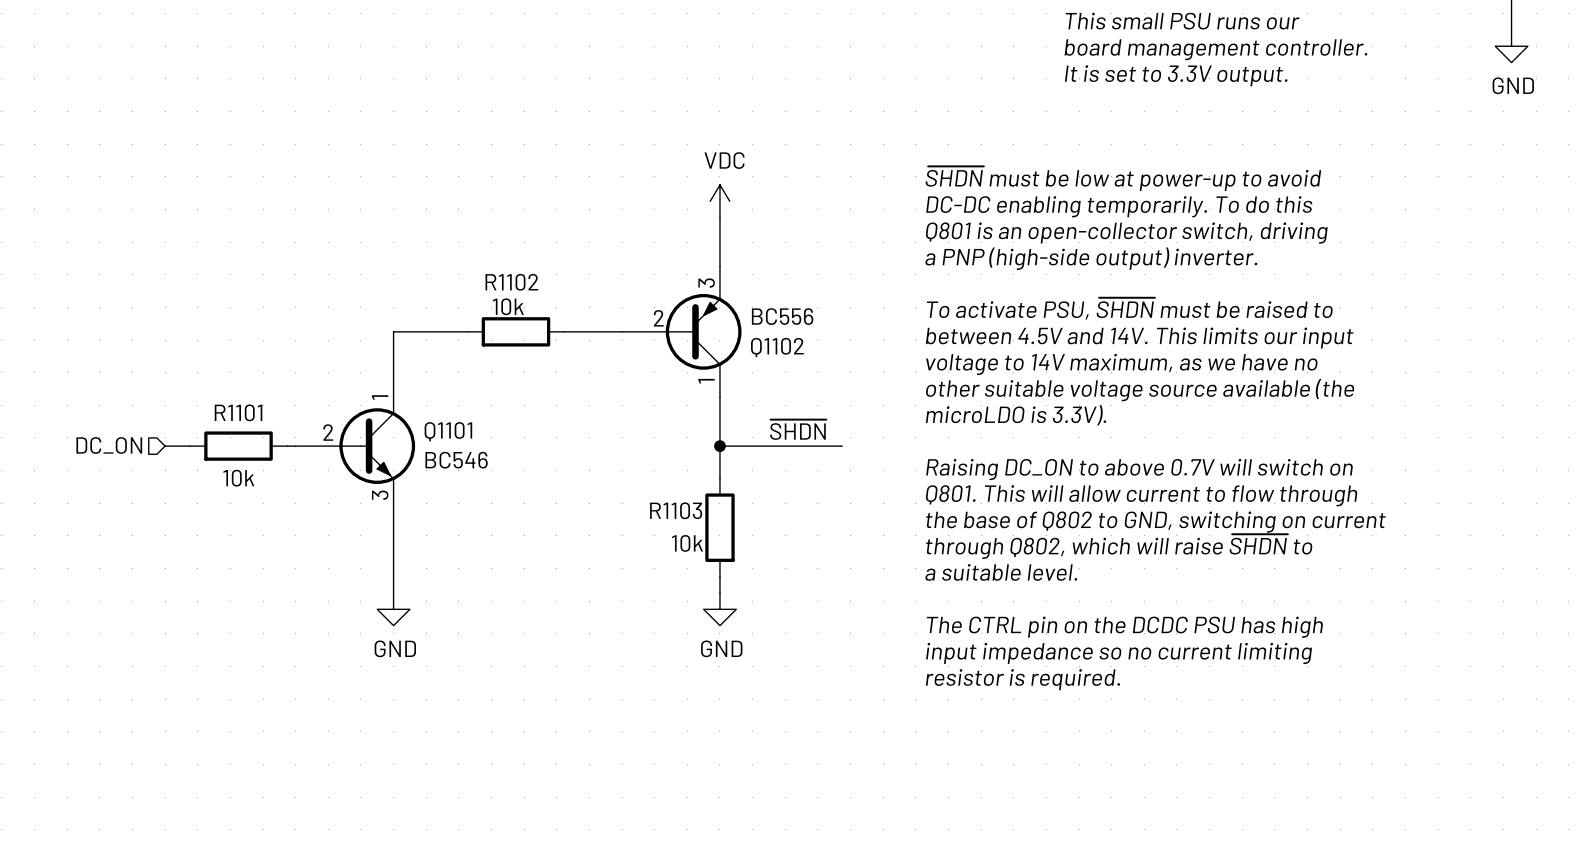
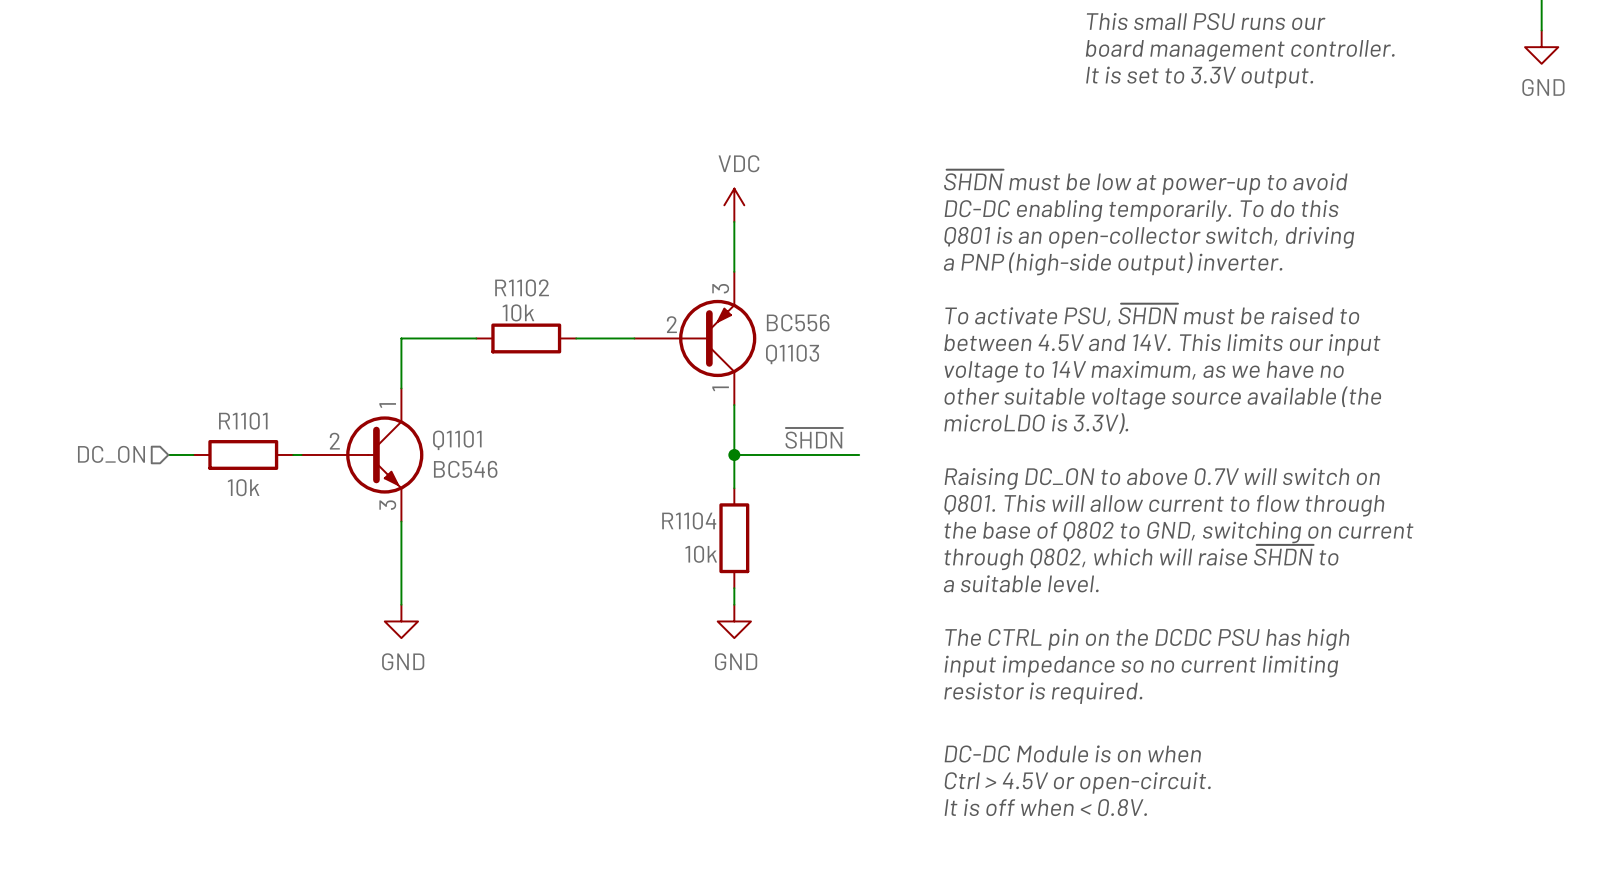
Q1102 name: Q1102 (777, 347) -> Q1103 (792, 354)
R1103 name: R1103 (676, 510) -> R1104 (689, 520)
text: none -> DC-DC Module is on when (1072, 753)
text: none -> Ctrl > 4.5V or open-circuit. (1077, 782)
text: none -> It is off when < 0.8V. (1045, 807)

